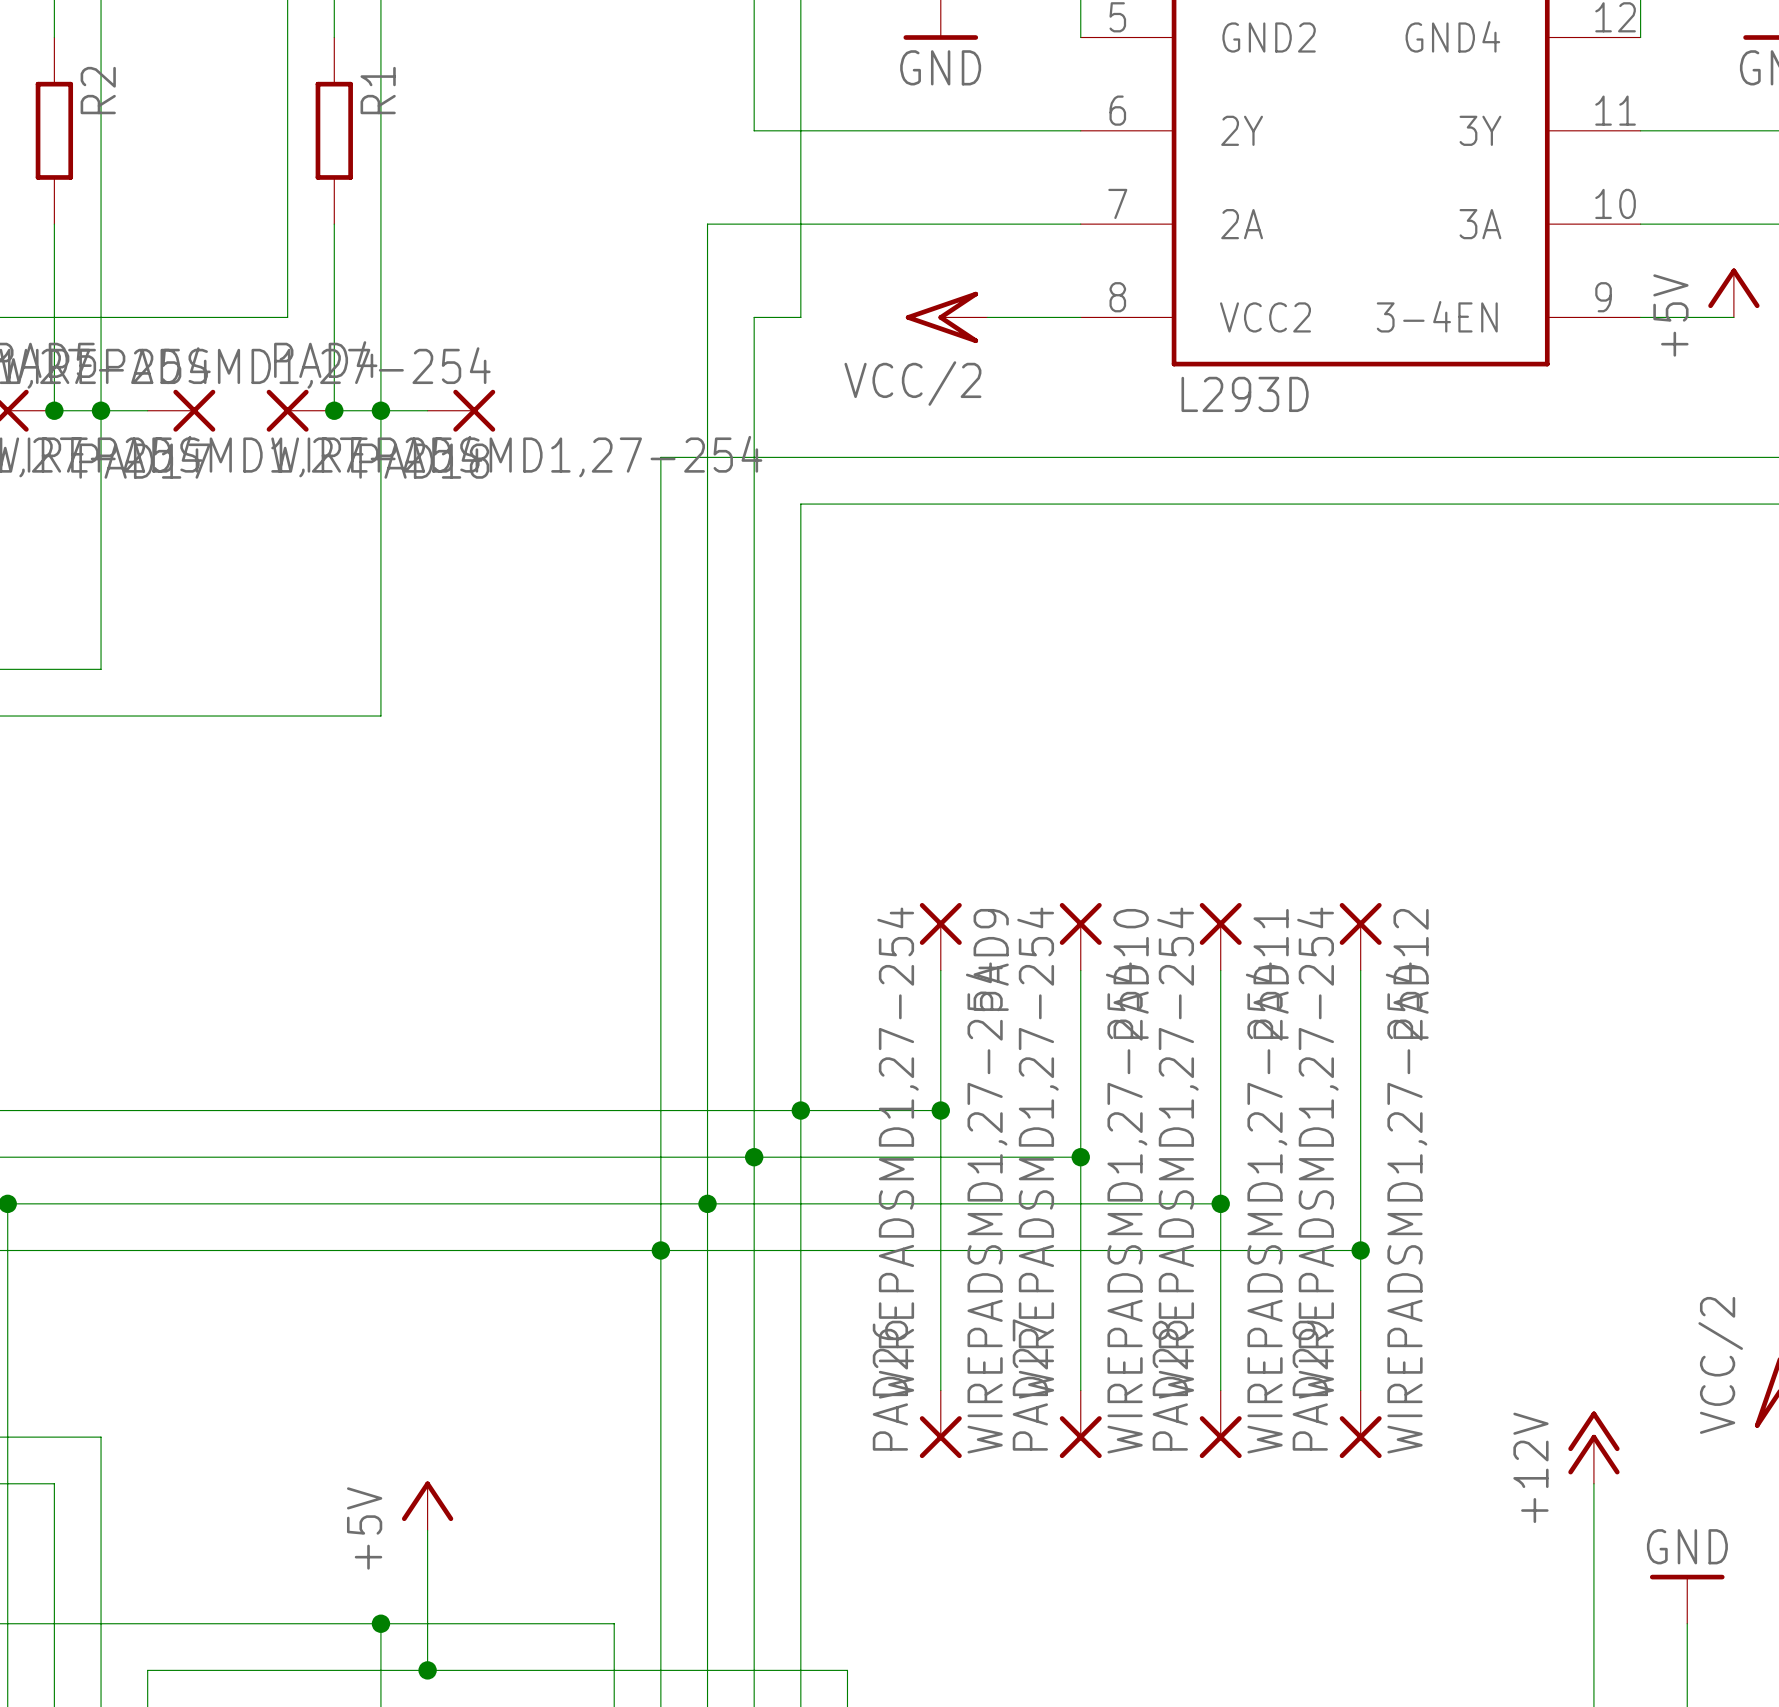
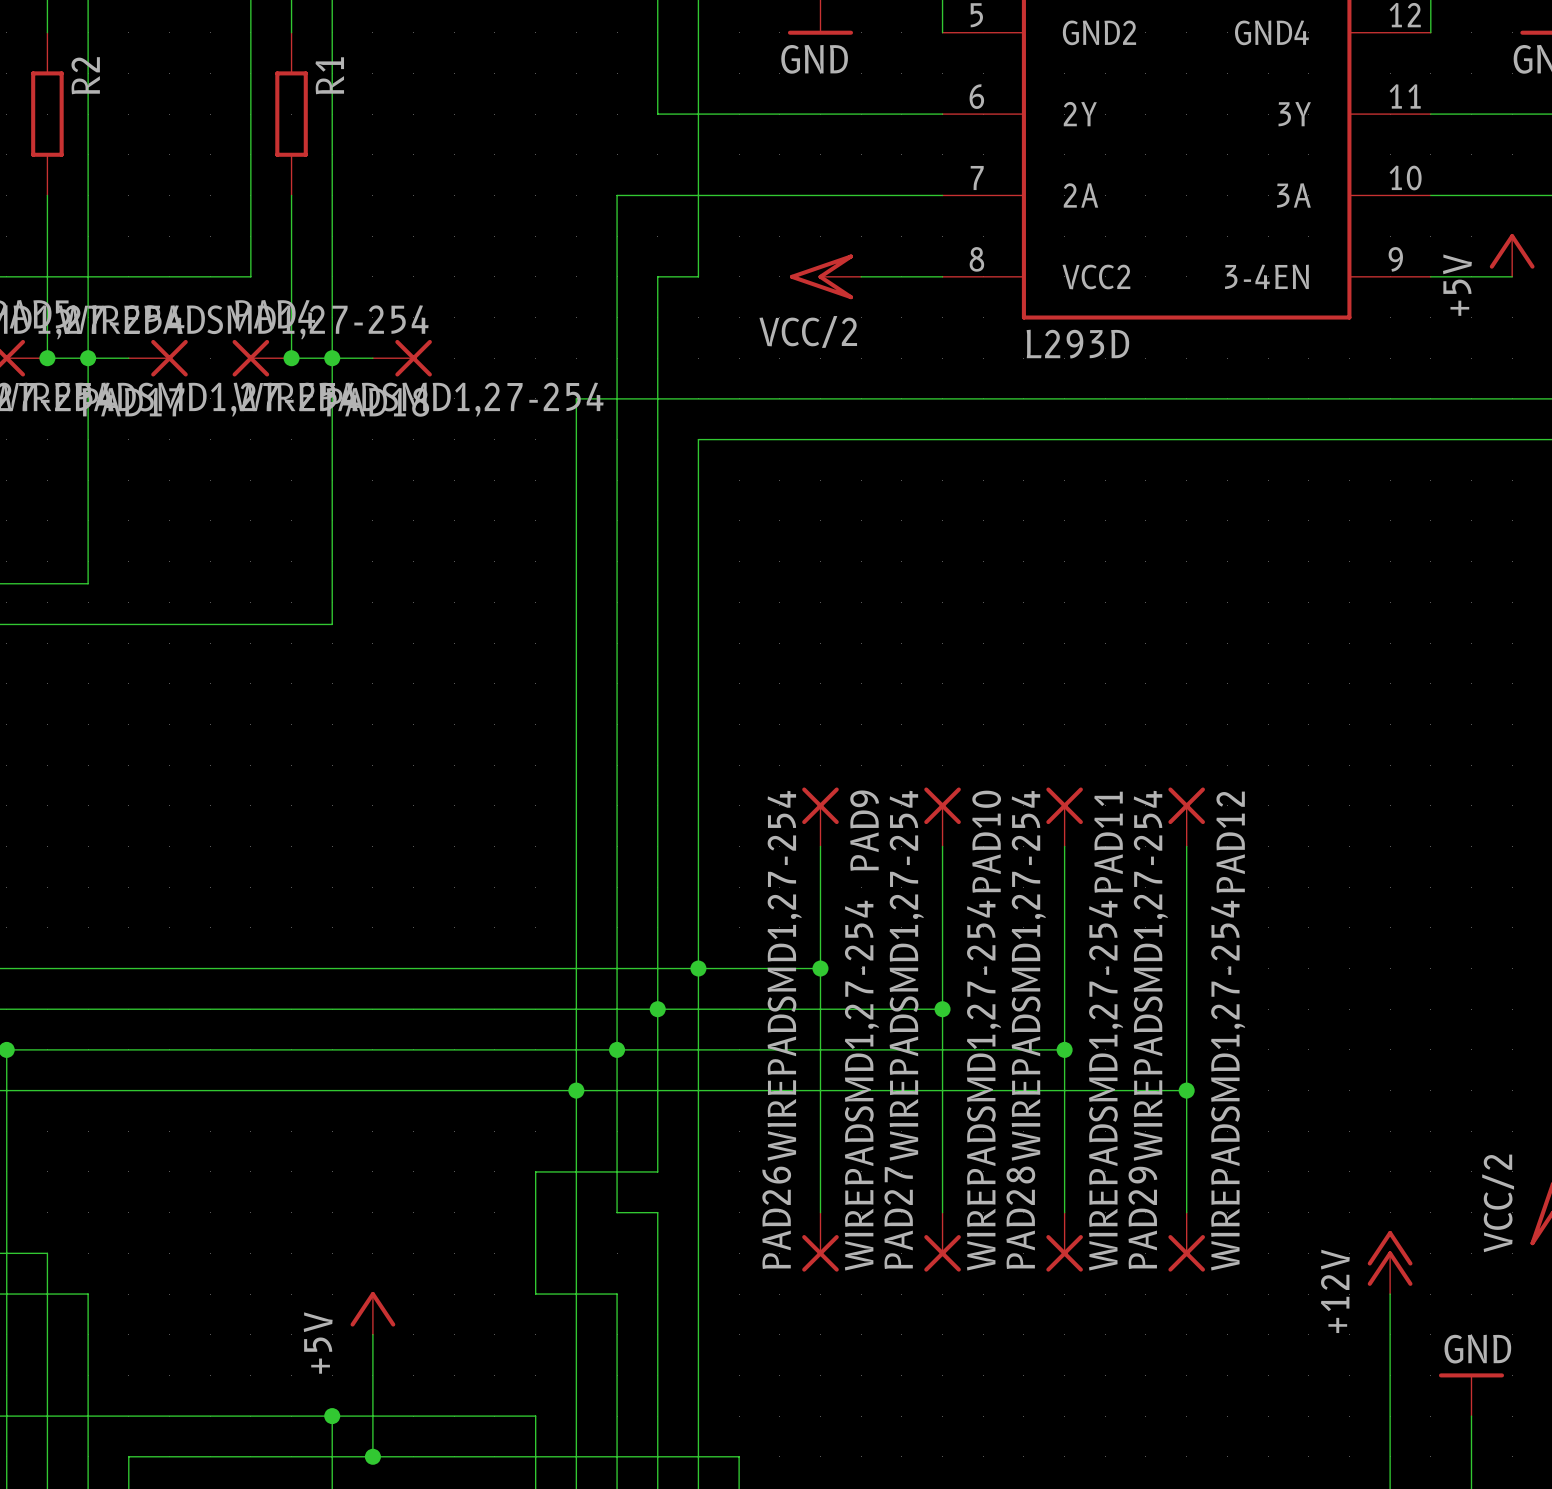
wire: (754, 1343) (754, 1390) -> (617, 1212) (657, 1212)
wire: (707, 1390) (707, 1483) -> (657, 1171) (535, 1171) (535, 1294) (617, 1294)
wire: (54, 1437) (101, 1437) (101, 1483) -> (47, 1253) (47, 1294) (88, 1294)

